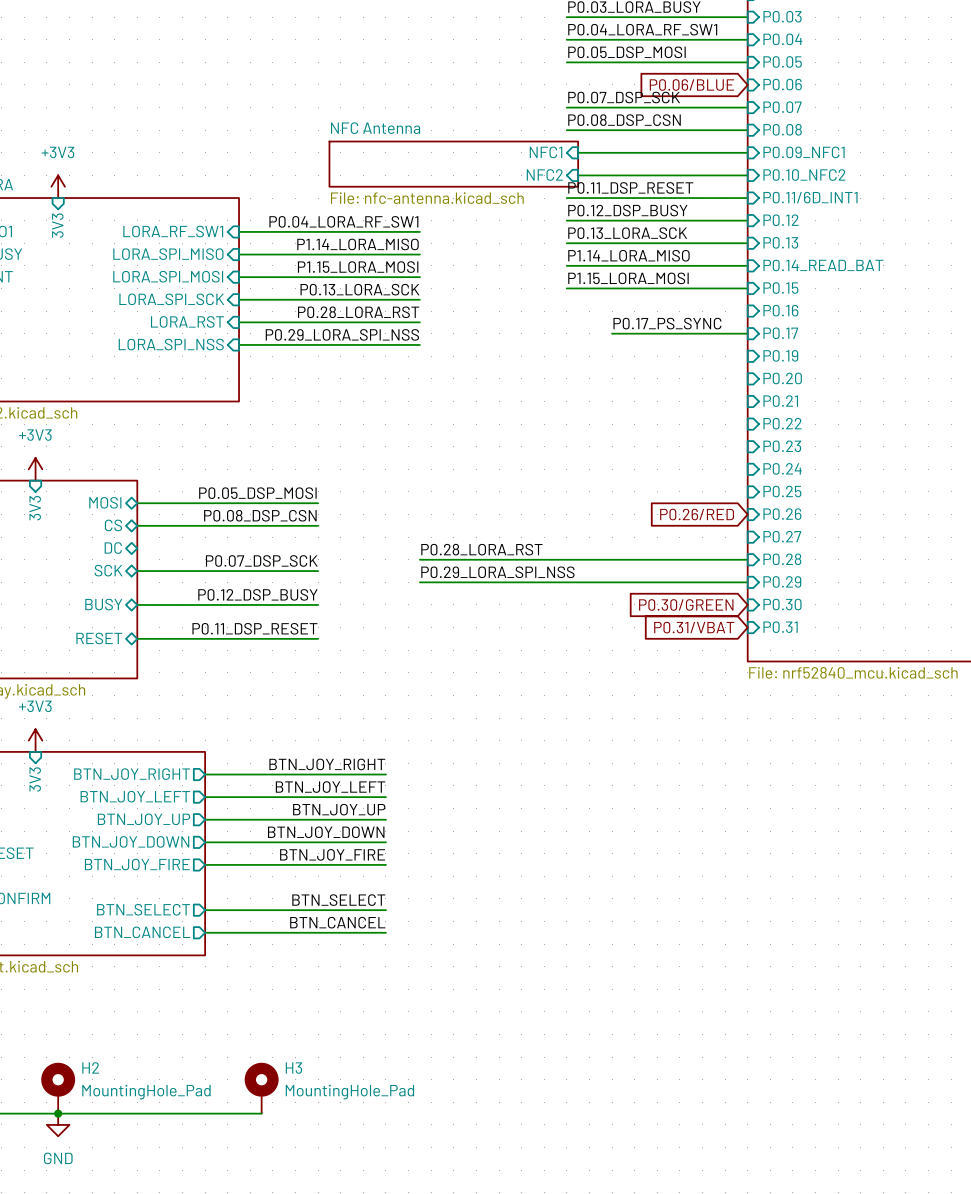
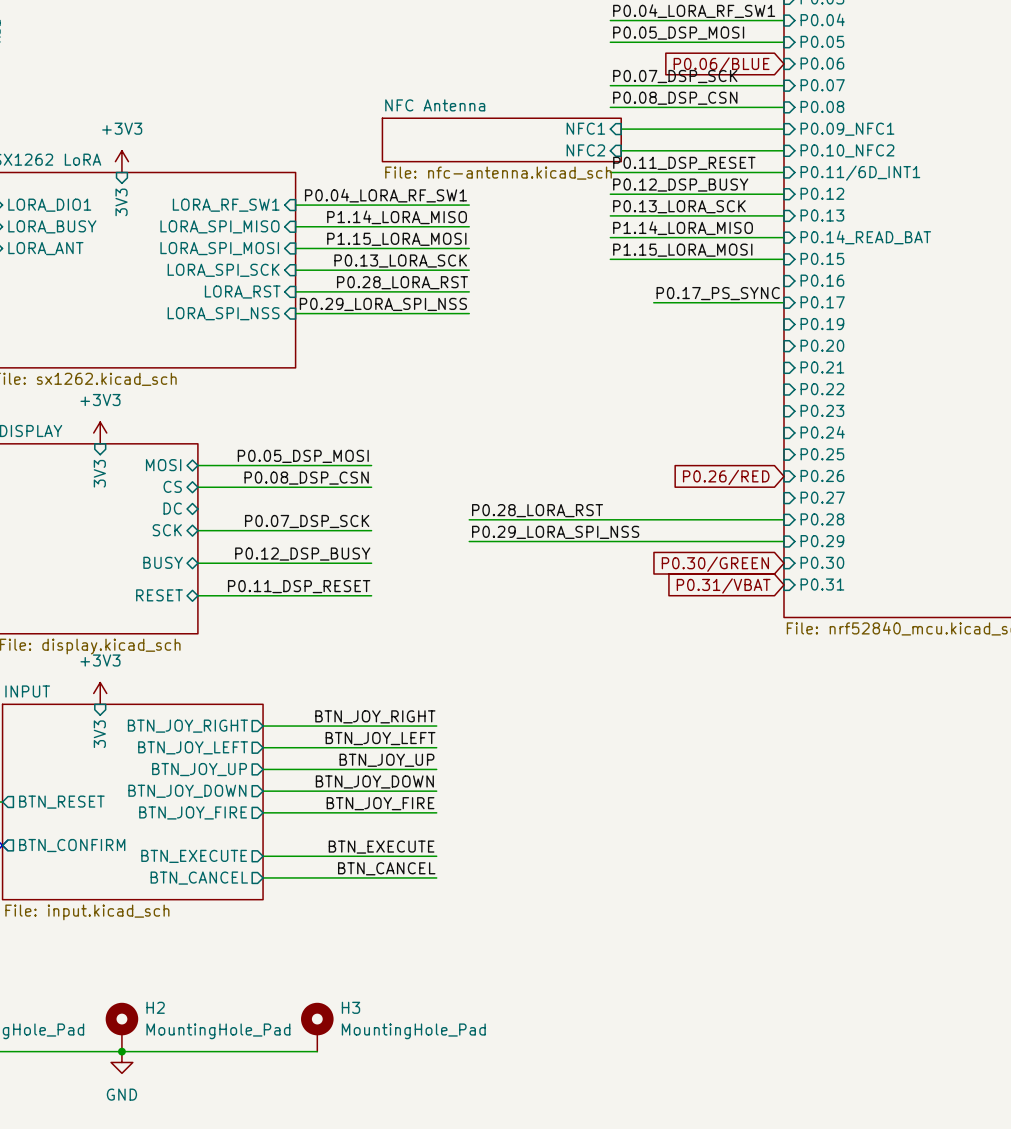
label: BTN_SELECT (338, 900) -> BTN_EXECUTE (381, 847)
sheet pin: BTN_SELECT (143, 909) -> BTN_EXECUTE (194, 856)

